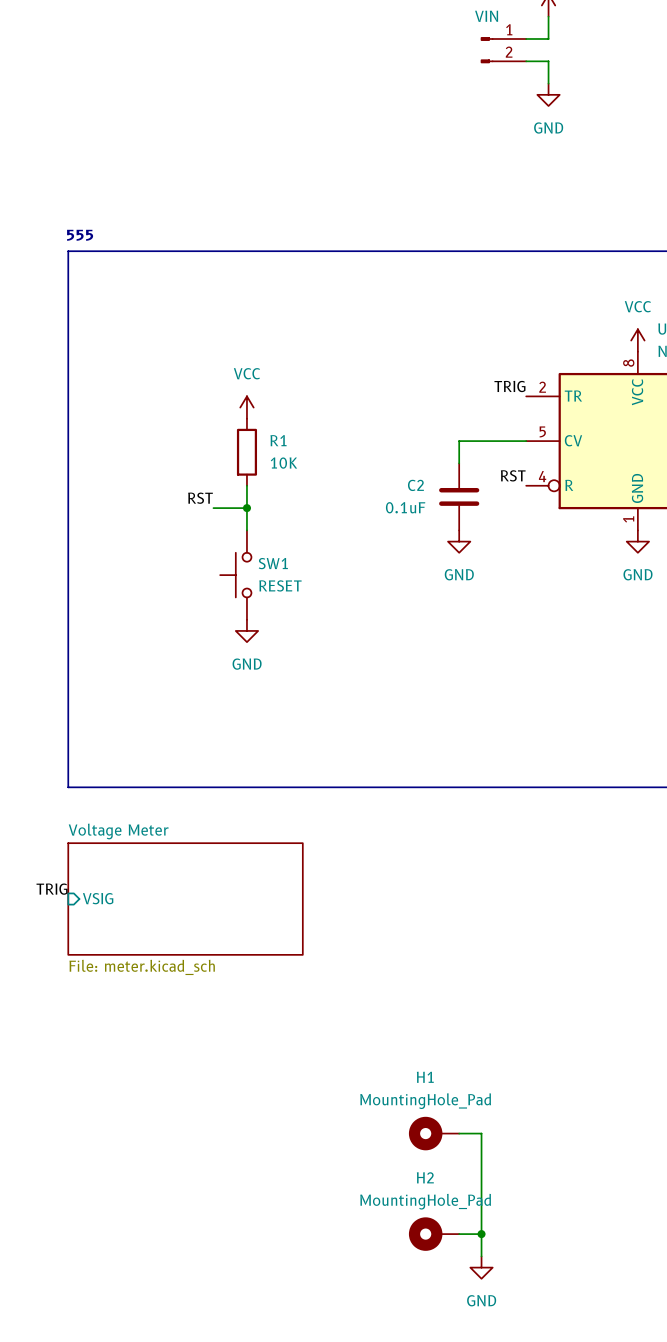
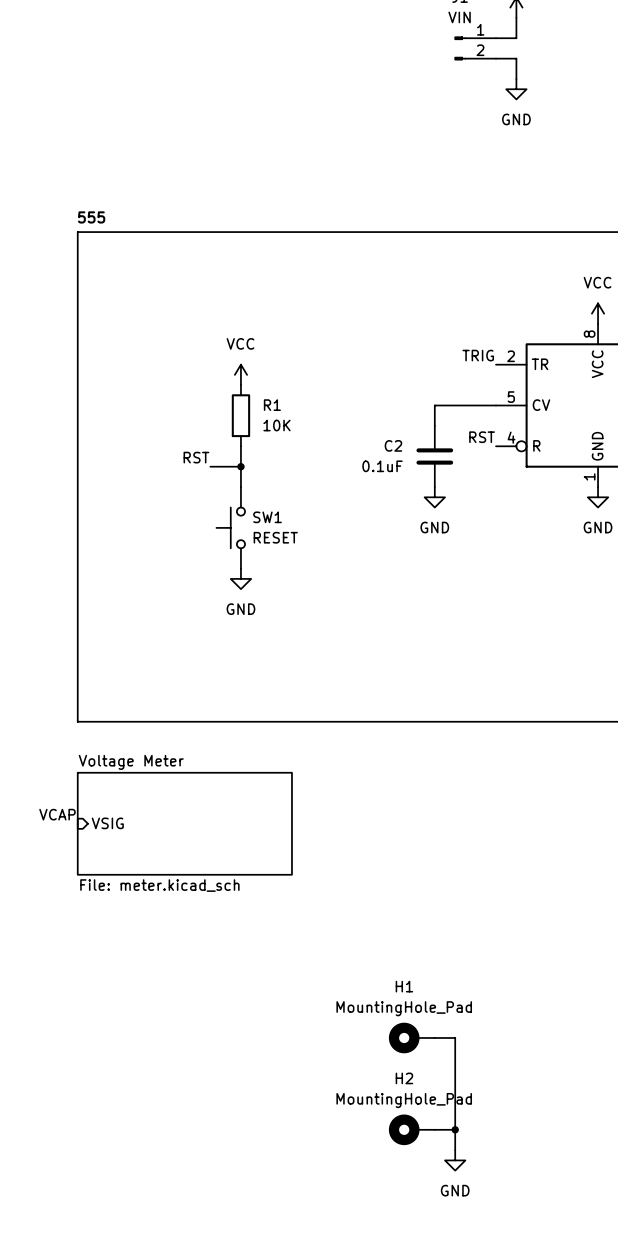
label: TRIG (52, 889) -> VCAP (57, 814)

